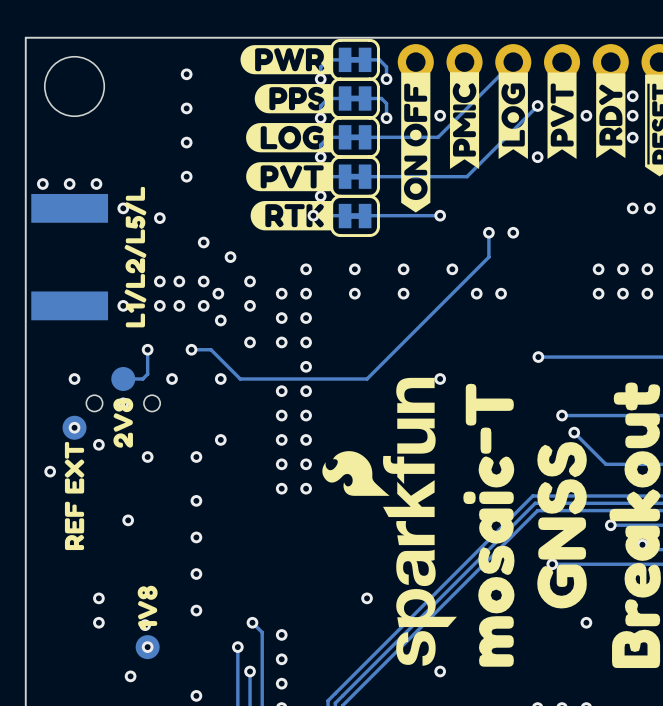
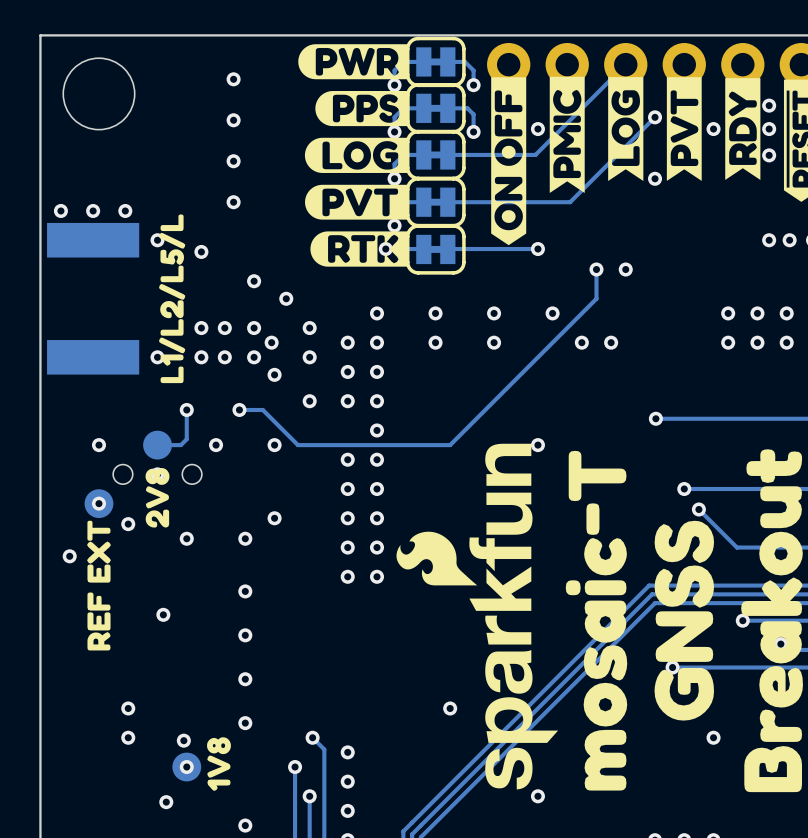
drawing position: (147, 608) -> (218, 764)

